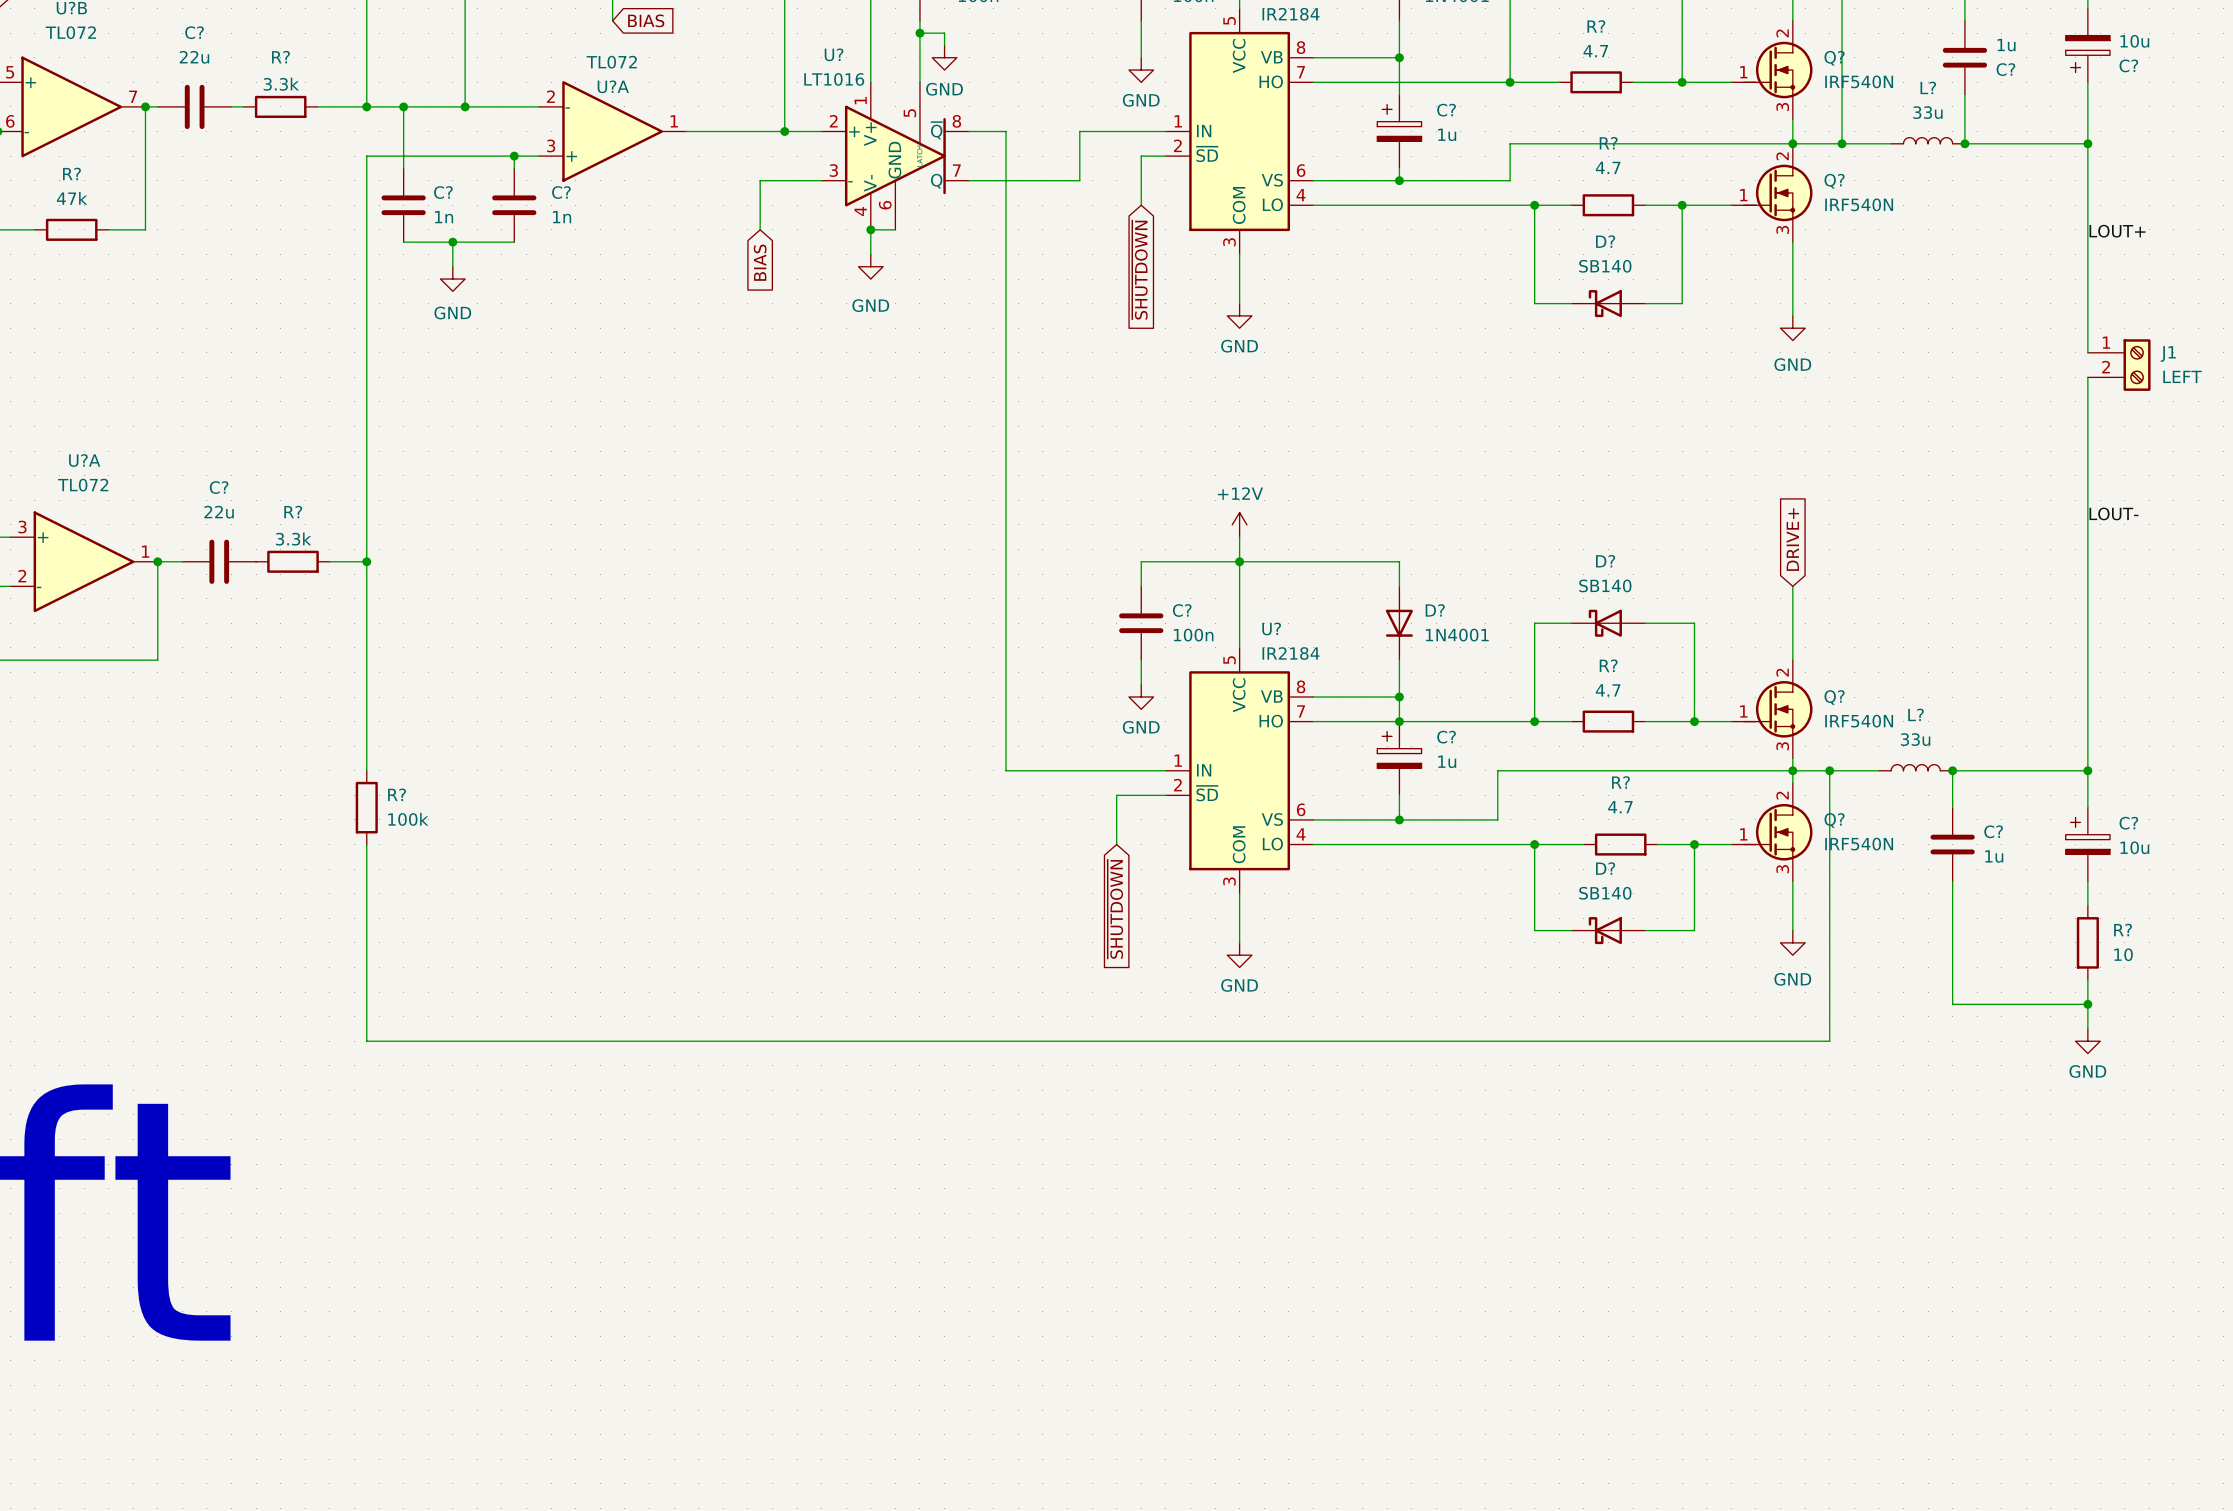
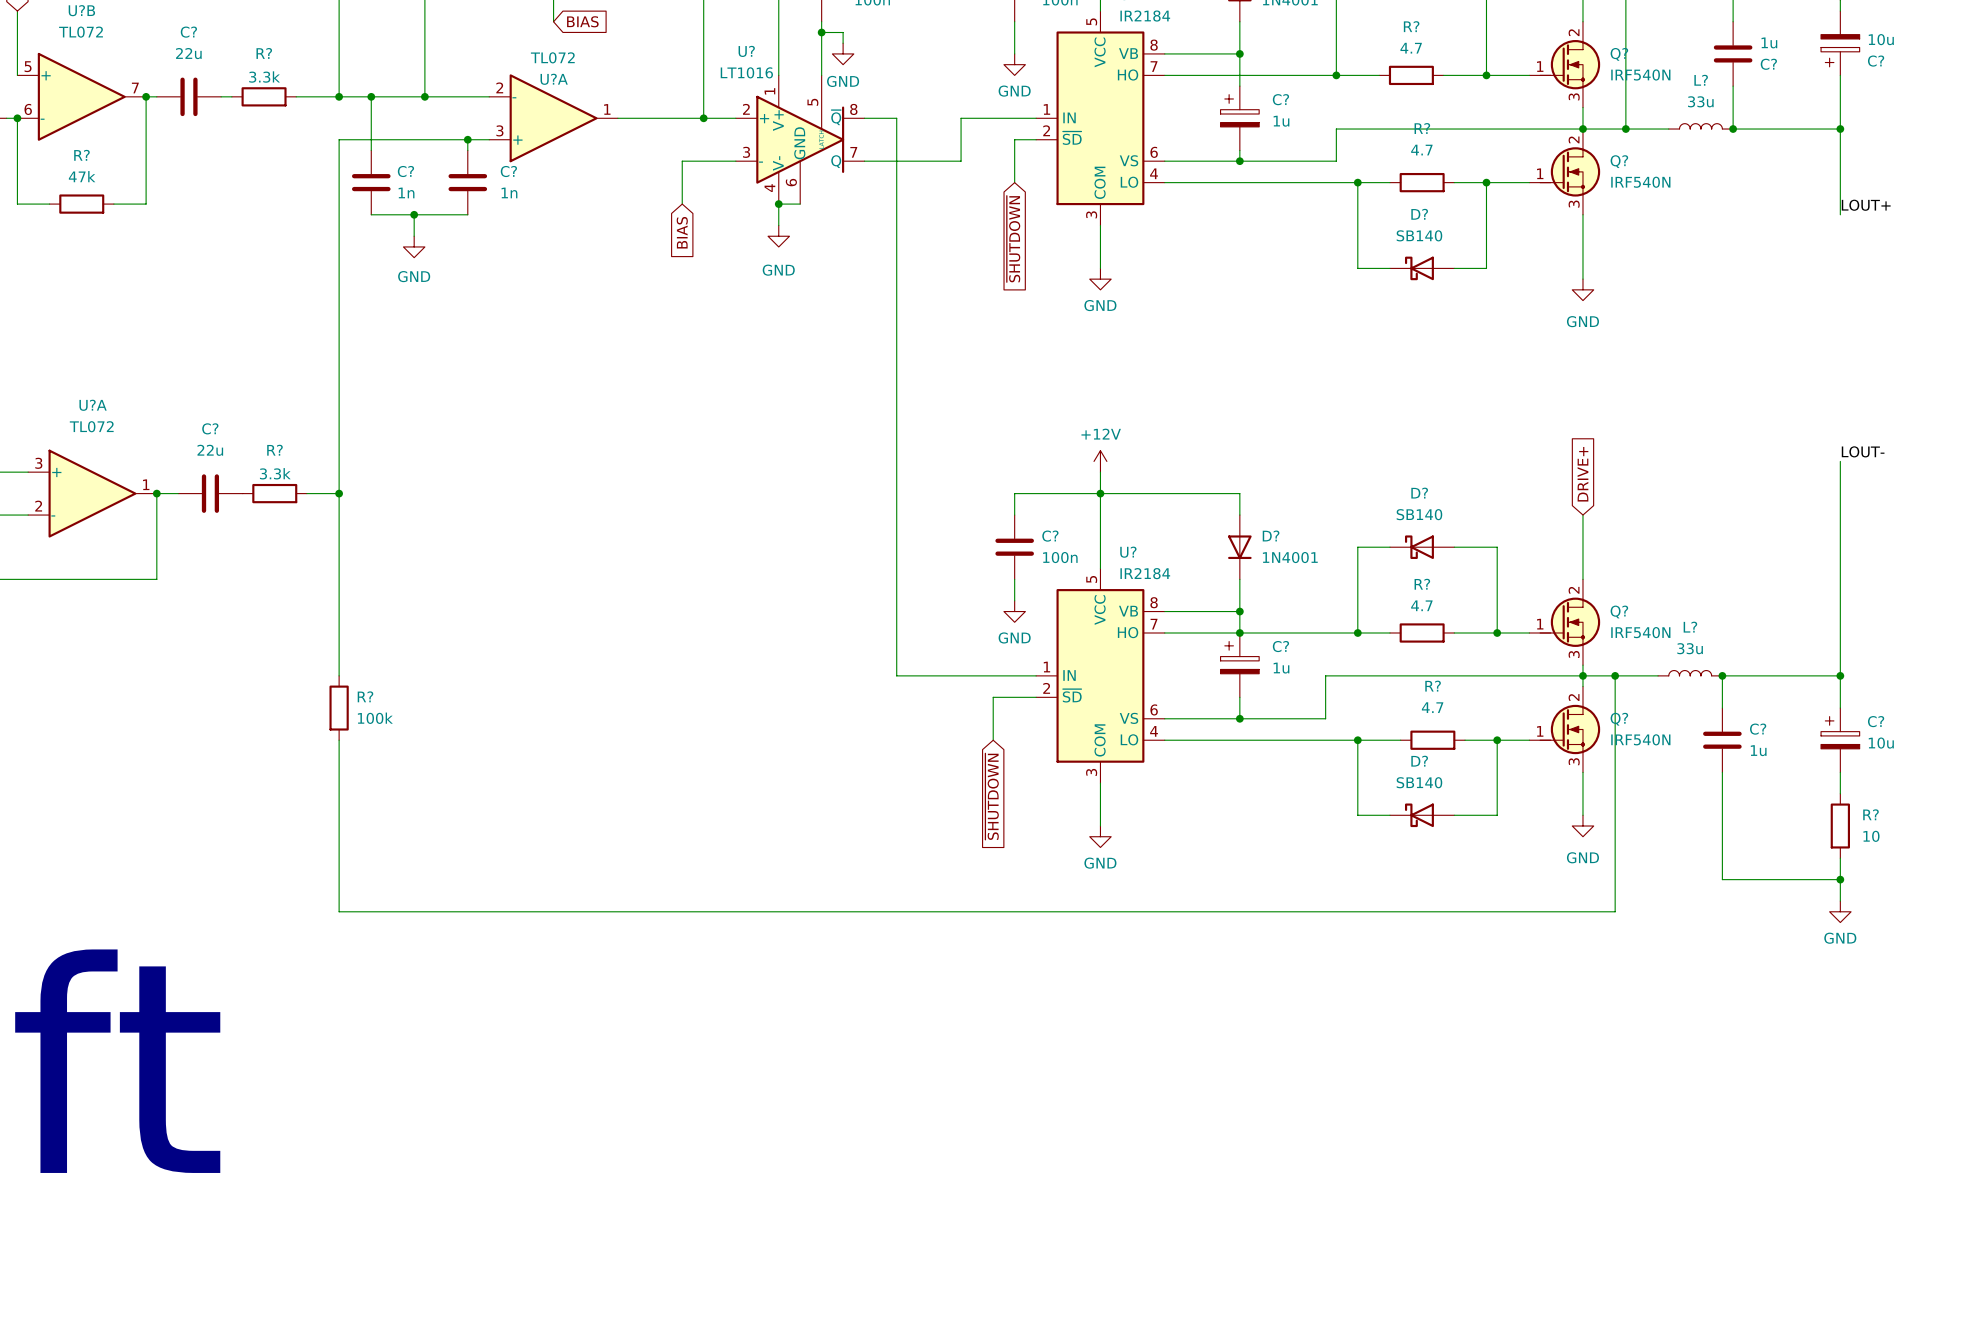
wire: (2087, 242) (2087, 352) -> none
J1: LEFT (2119, 365) -> none
wire: (2087, 377) (2087, 524) -> none

